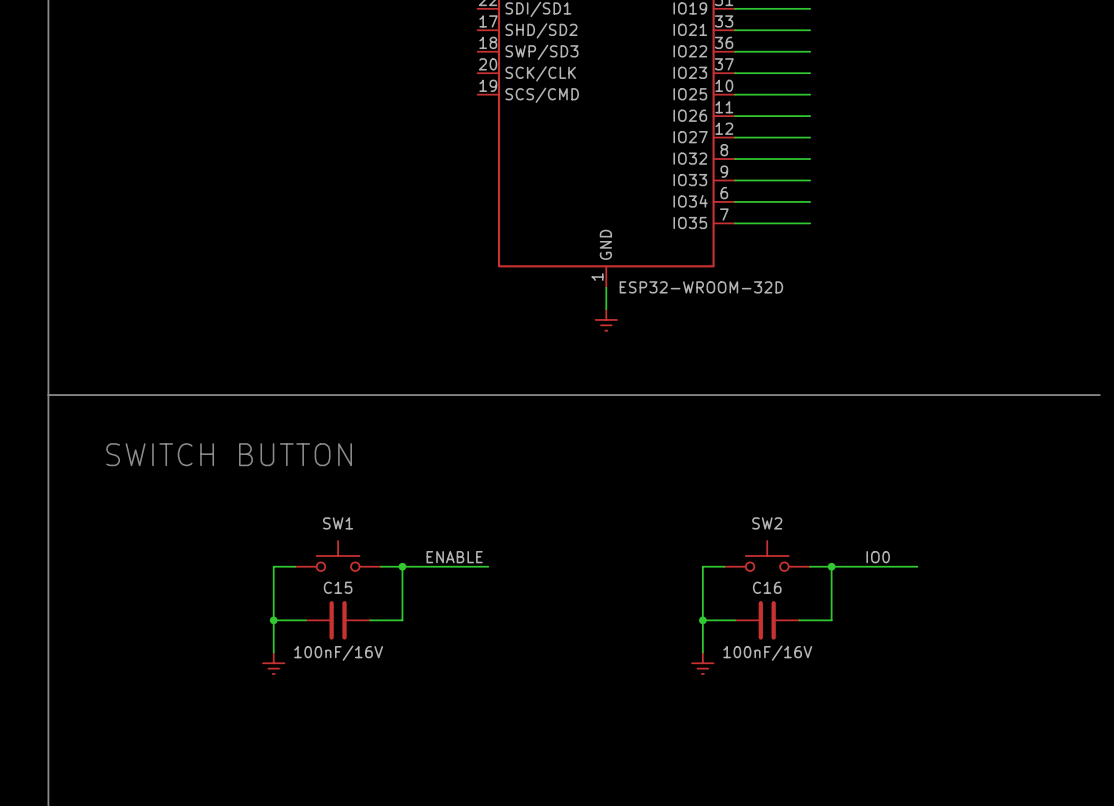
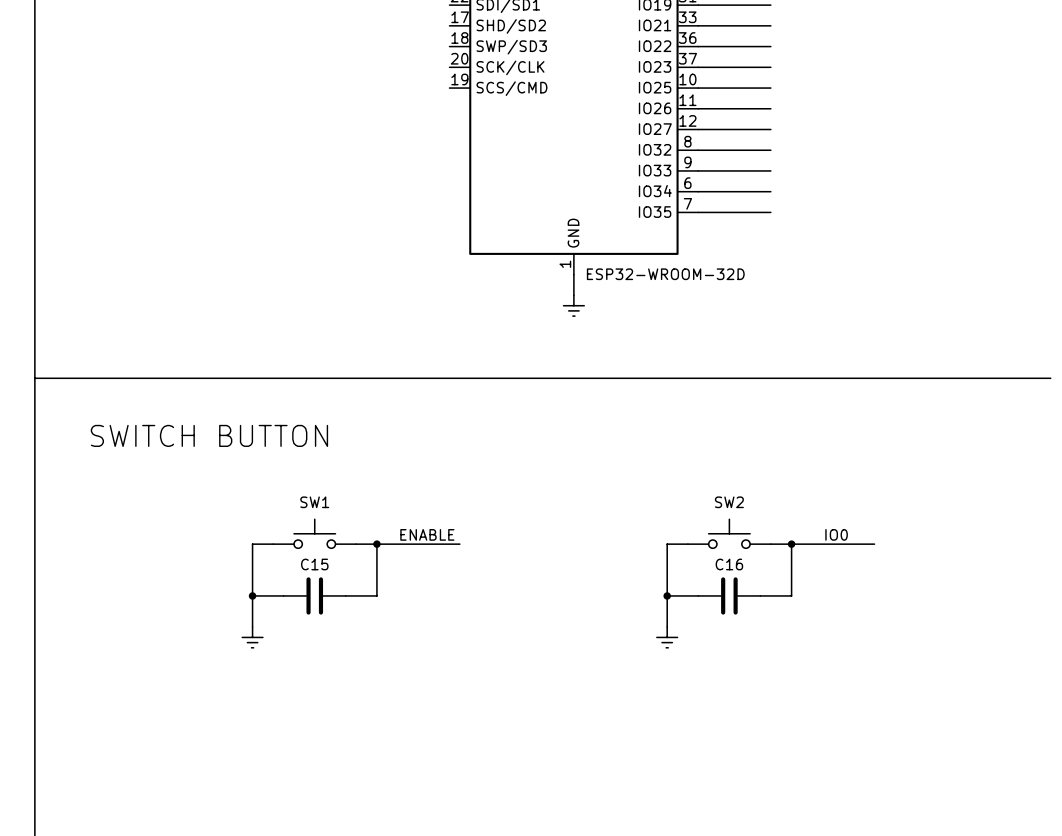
C15 value: 100nF/16V (338, 653) -> none
C16 value: 100nF/16V (767, 653) -> none

